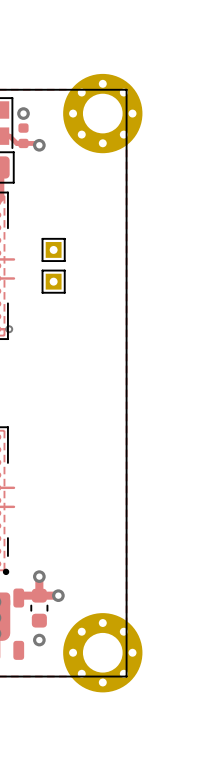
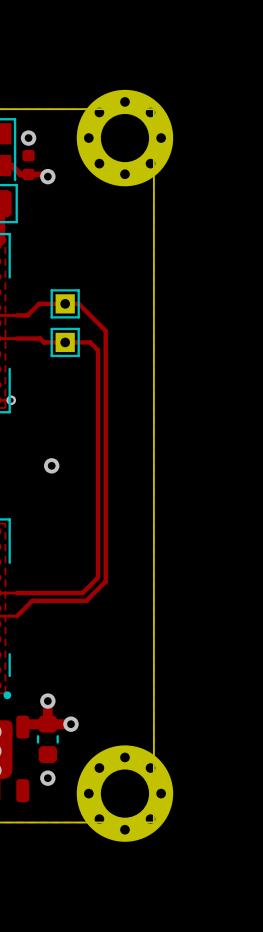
track: none -> (17, 315) (27, 315) (39, 303) (78, 303) (105, 330) (105, 581) (86, 600) (32, 600) (17, 616)
track: none -> (17, 338) (40, 338) (43, 342) (90, 342) (97, 350) (97, 577) (82, 593) (17, 593)
via: none -> (51, 465)

